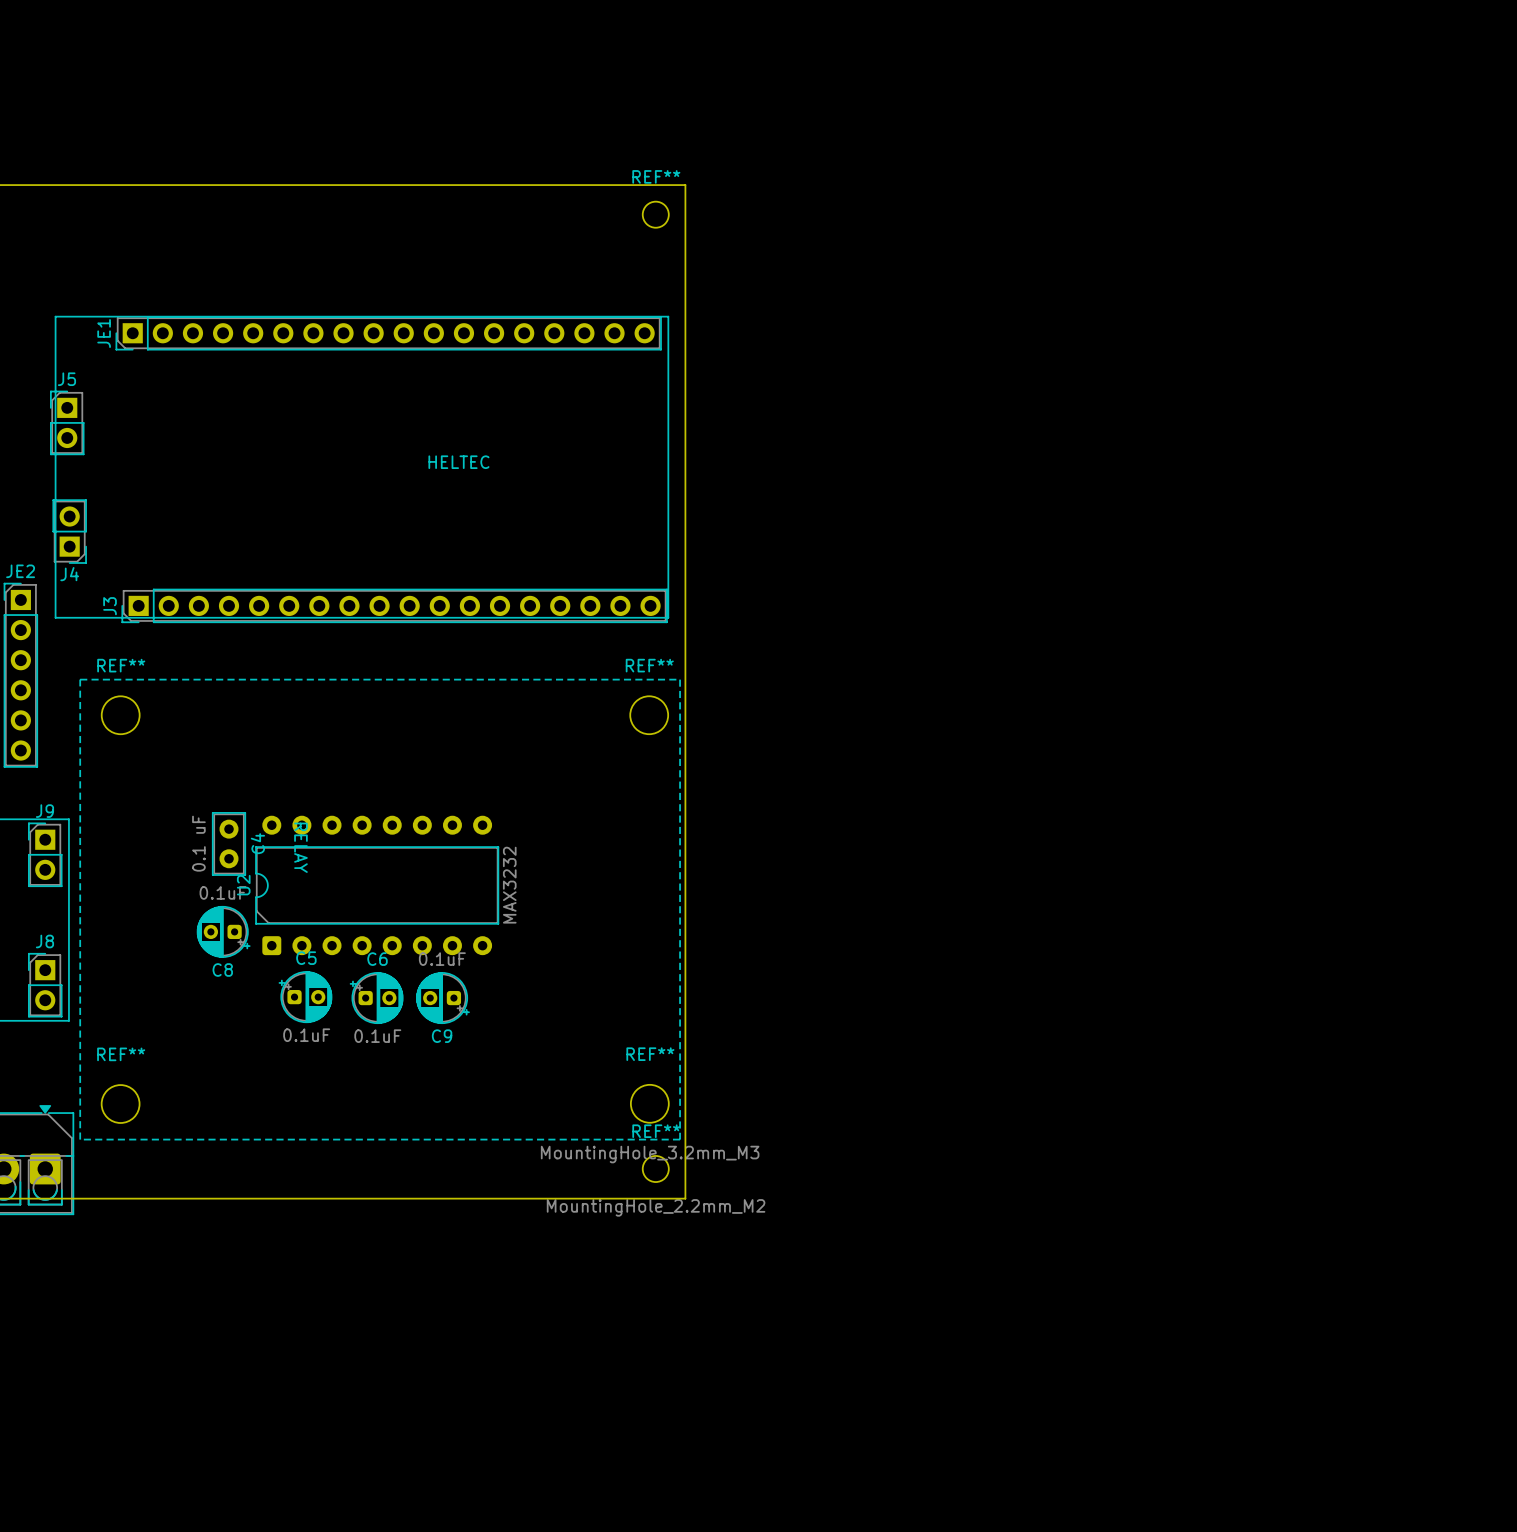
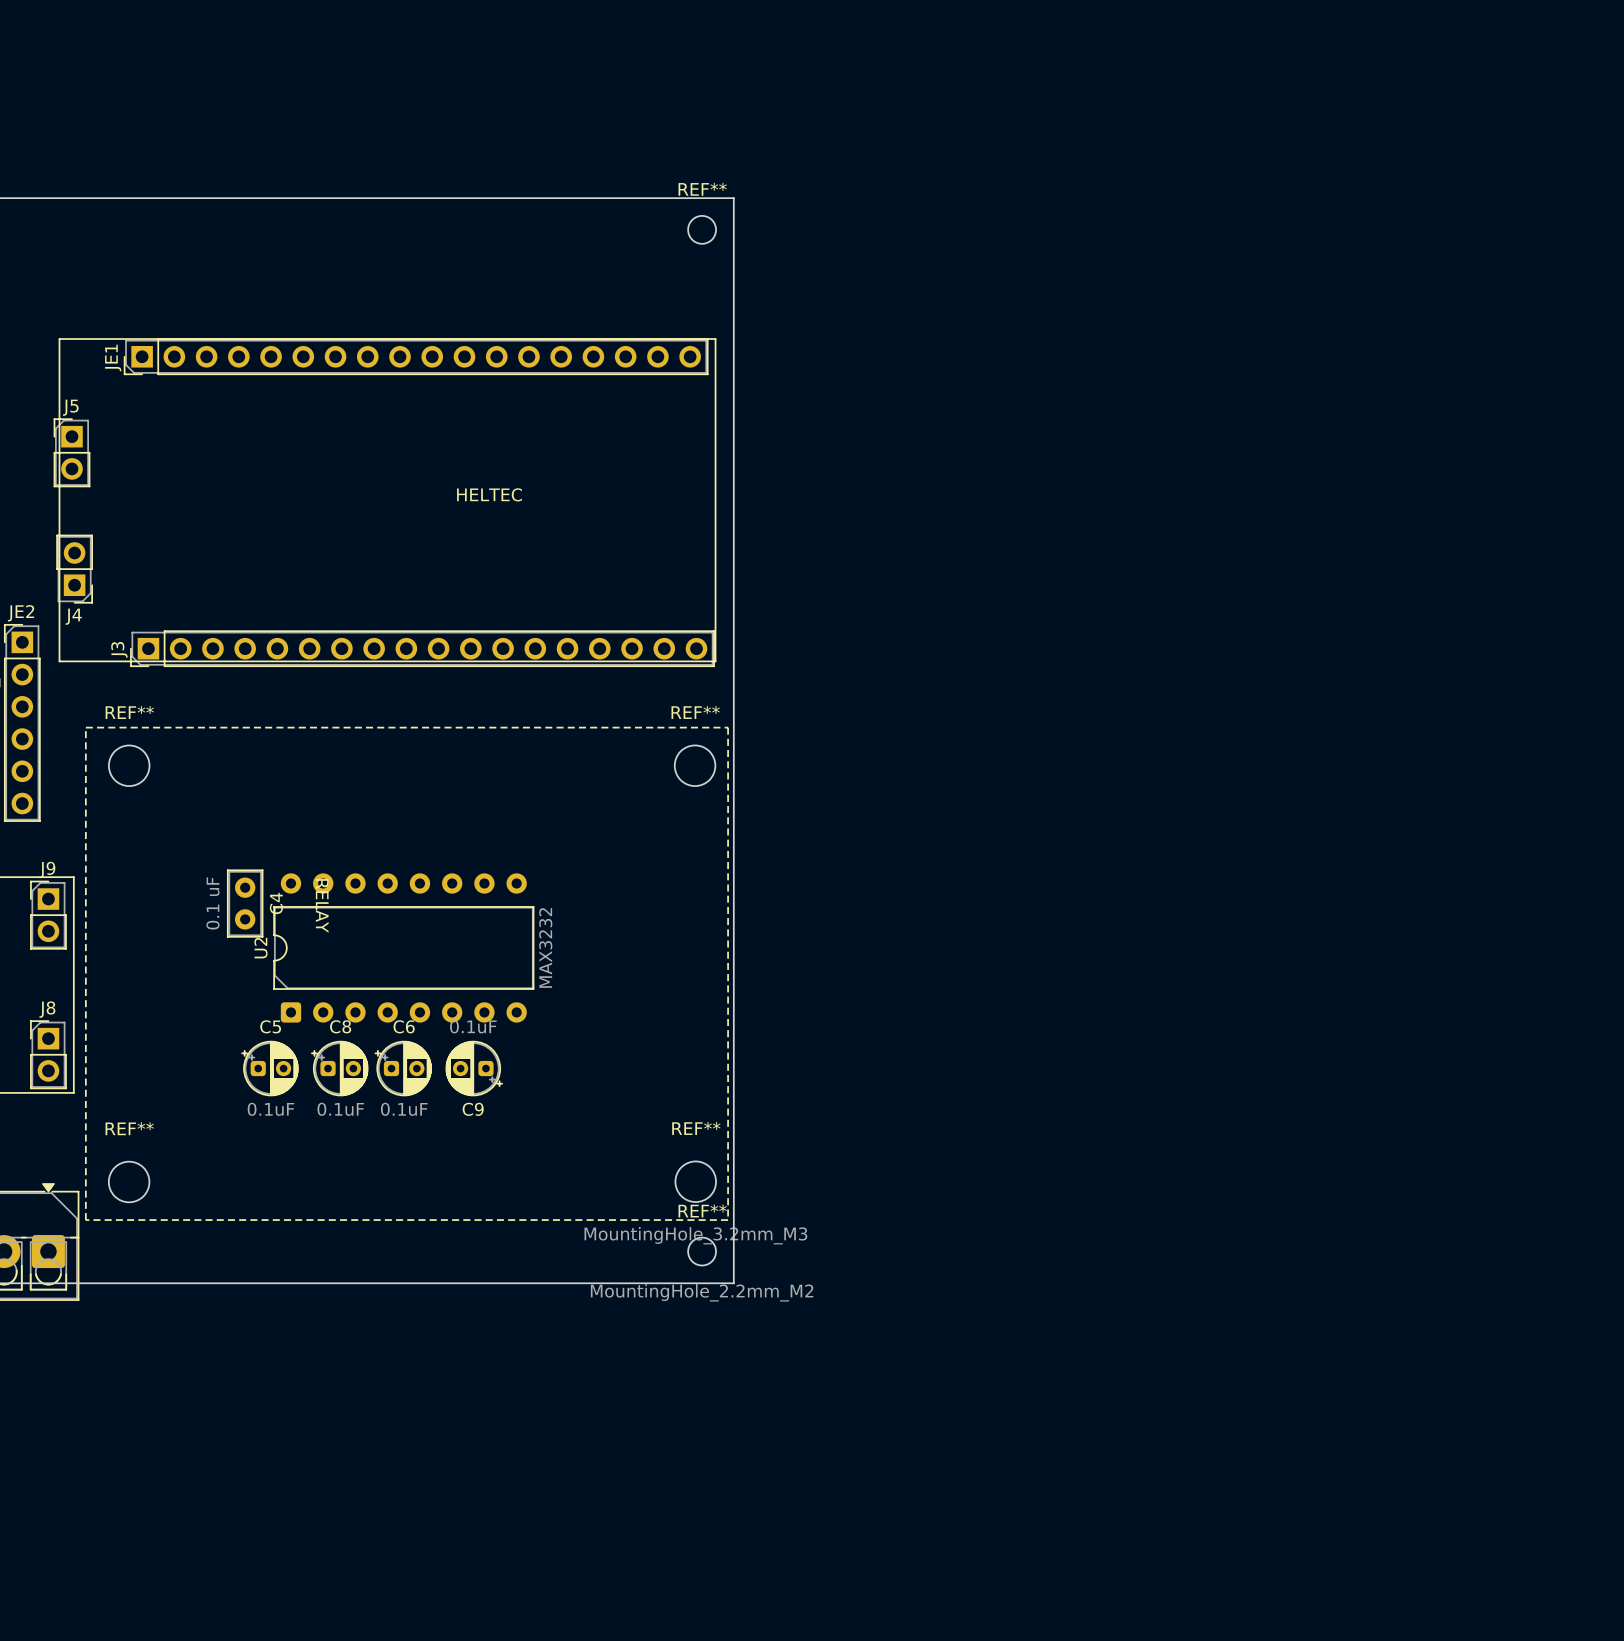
C8 rotation: 0° (223, 931) -> 180° (339, 1068)
C8 position: (223, 931) -> (339, 1068)
C5 position: (305, 997) -> (269, 1068)

